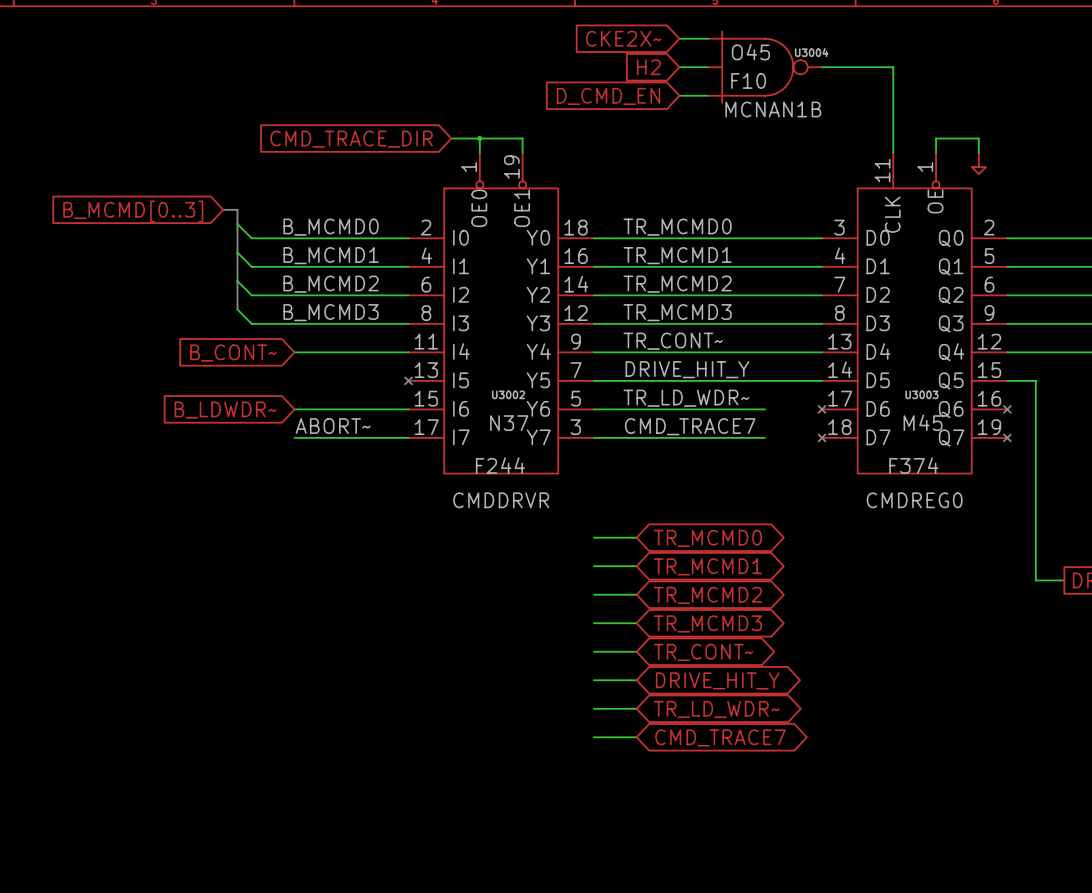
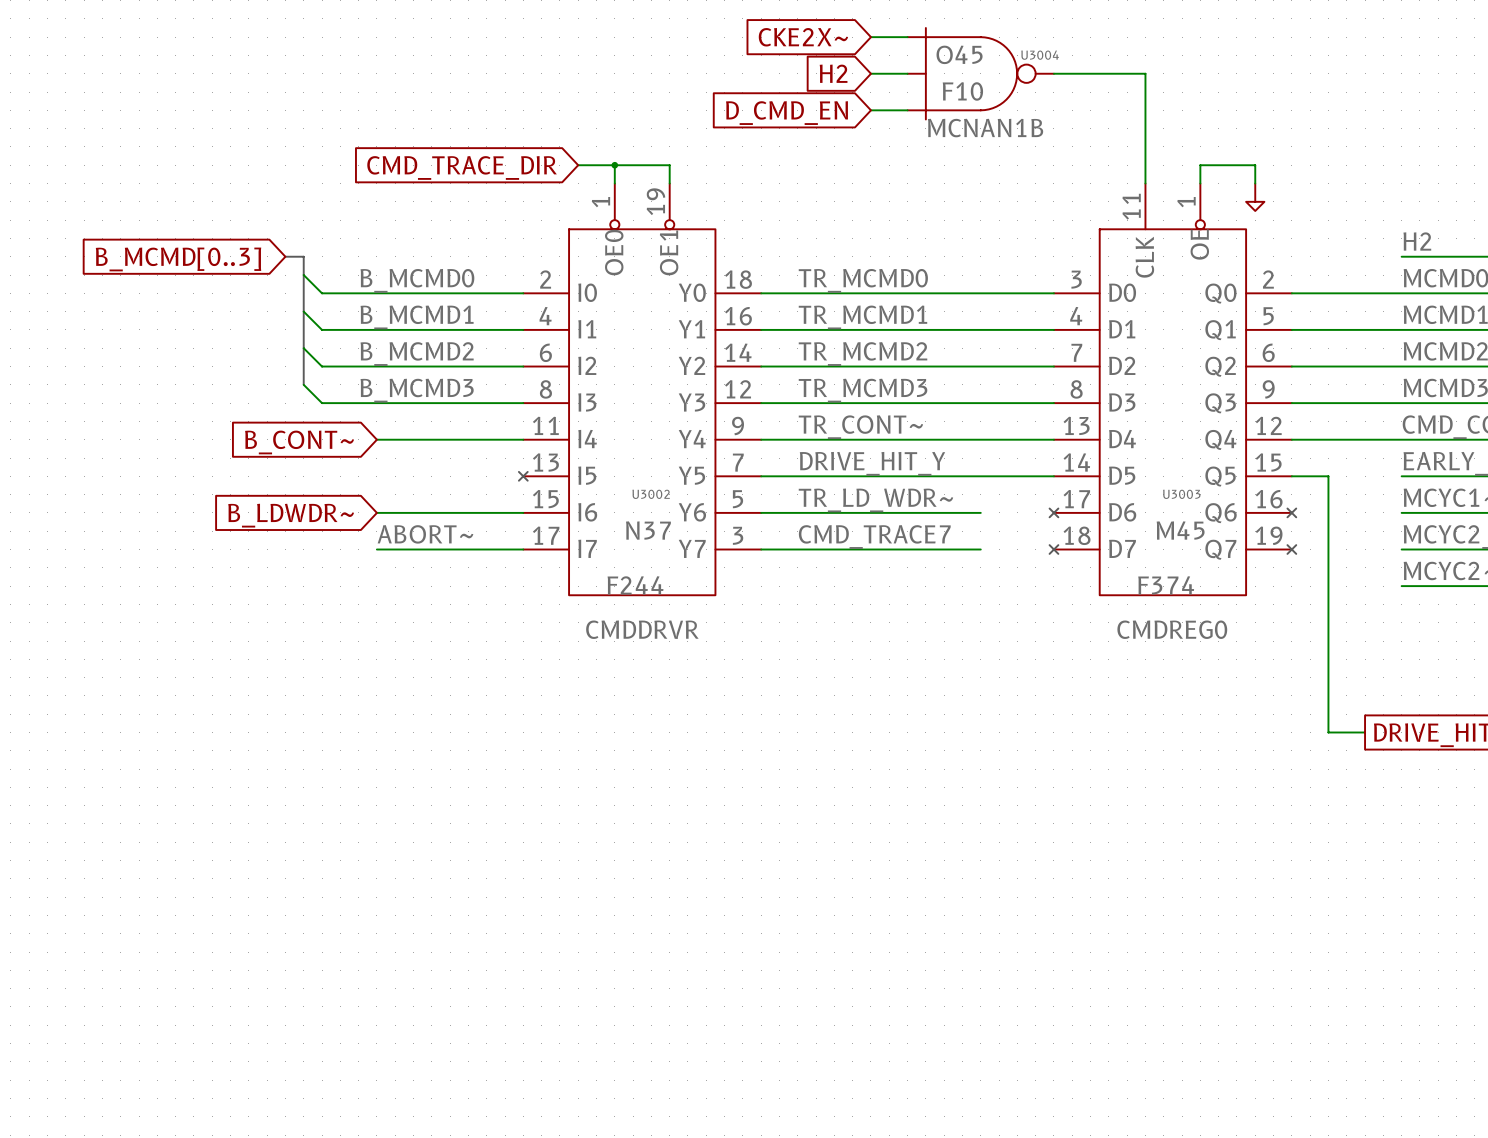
wire: (593, 537) (636, 537) -> none
global label: TR_MCMD0 (707, 538) -> none
wire: (593, 566) (636, 566) -> none
global label: TR_MCMD1 (707, 566) -> none
wire: (593, 594) (636, 594) -> none
global label: TR_MCMD2 (707, 595) -> none
wire: (593, 623) (636, 623) -> none
global label: TR_MCMD3 (707, 623) -> none
wire: (593, 651) (636, 651) -> none
global label: TR_CONT~ (703, 652) -> none
wire: (593, 680) (636, 680) -> none
global label: DRIVE_HIT_Y (717, 680) -> none
wire: (593, 708) (636, 708) -> none
global label: TR_LD_WDR~ (716, 709) -> none
wire: (593, 737) (636, 737) -> none
global label: CMD_TRACE7 (720, 737) -> none

